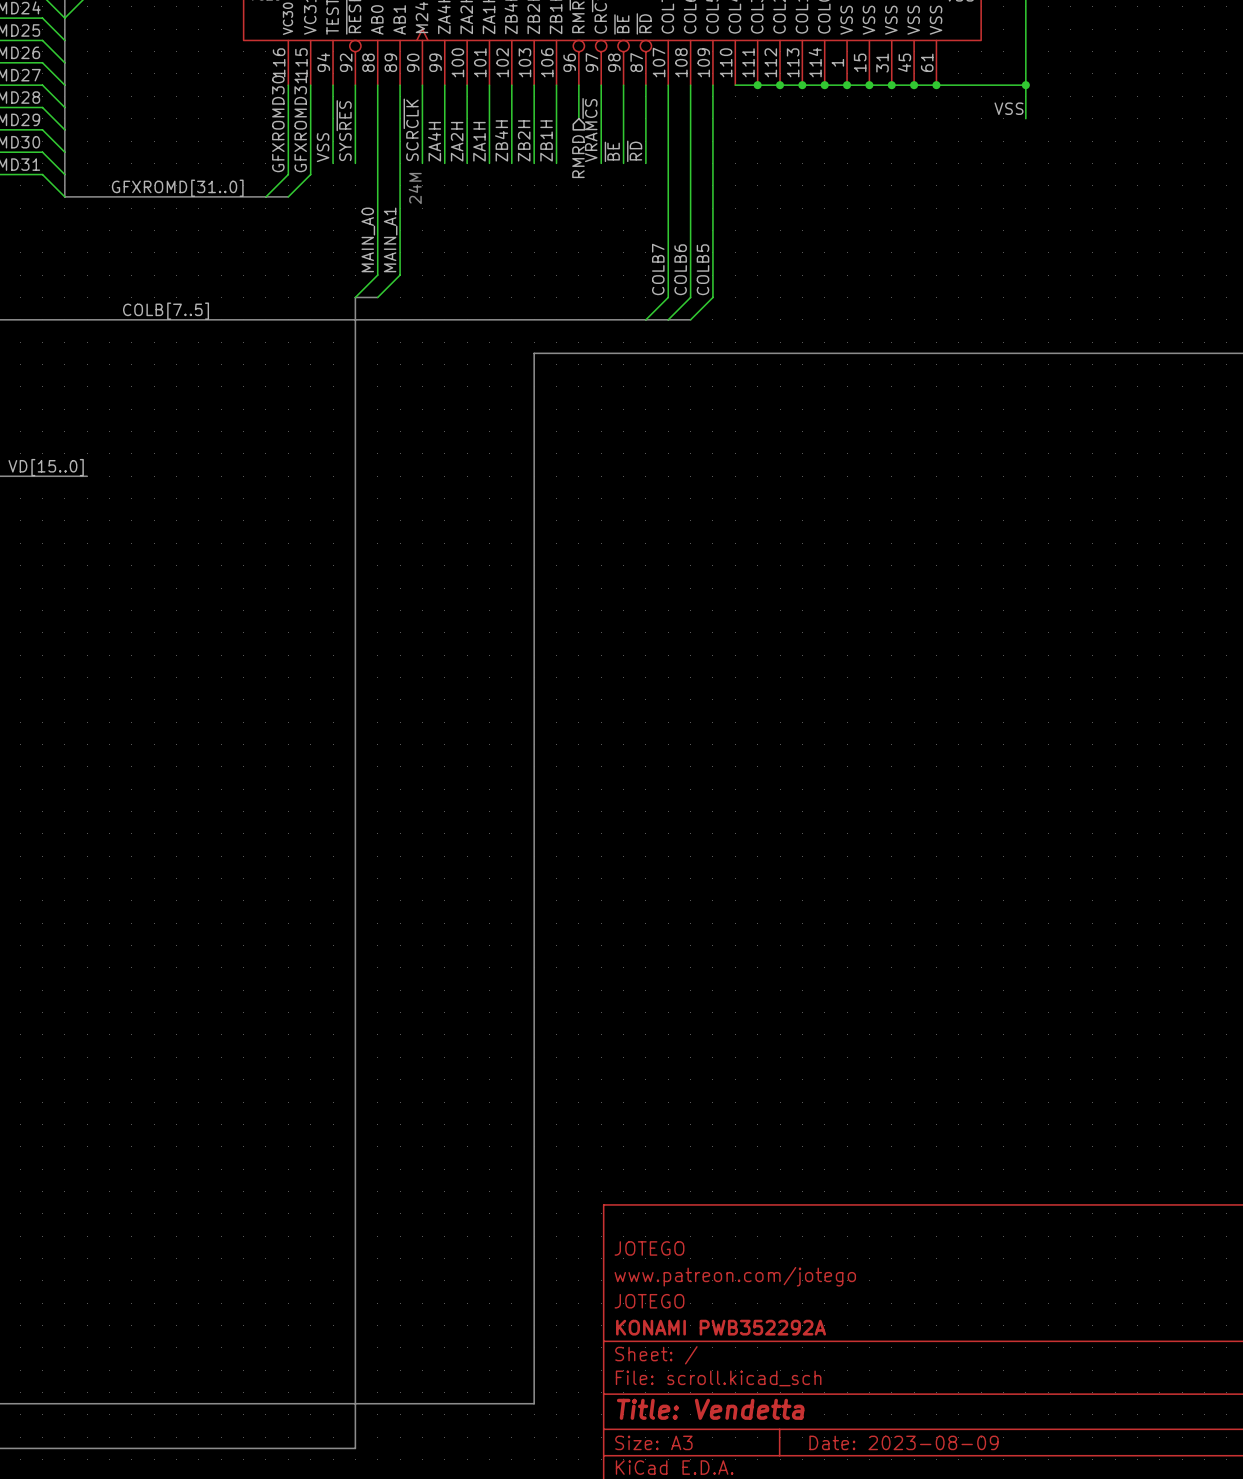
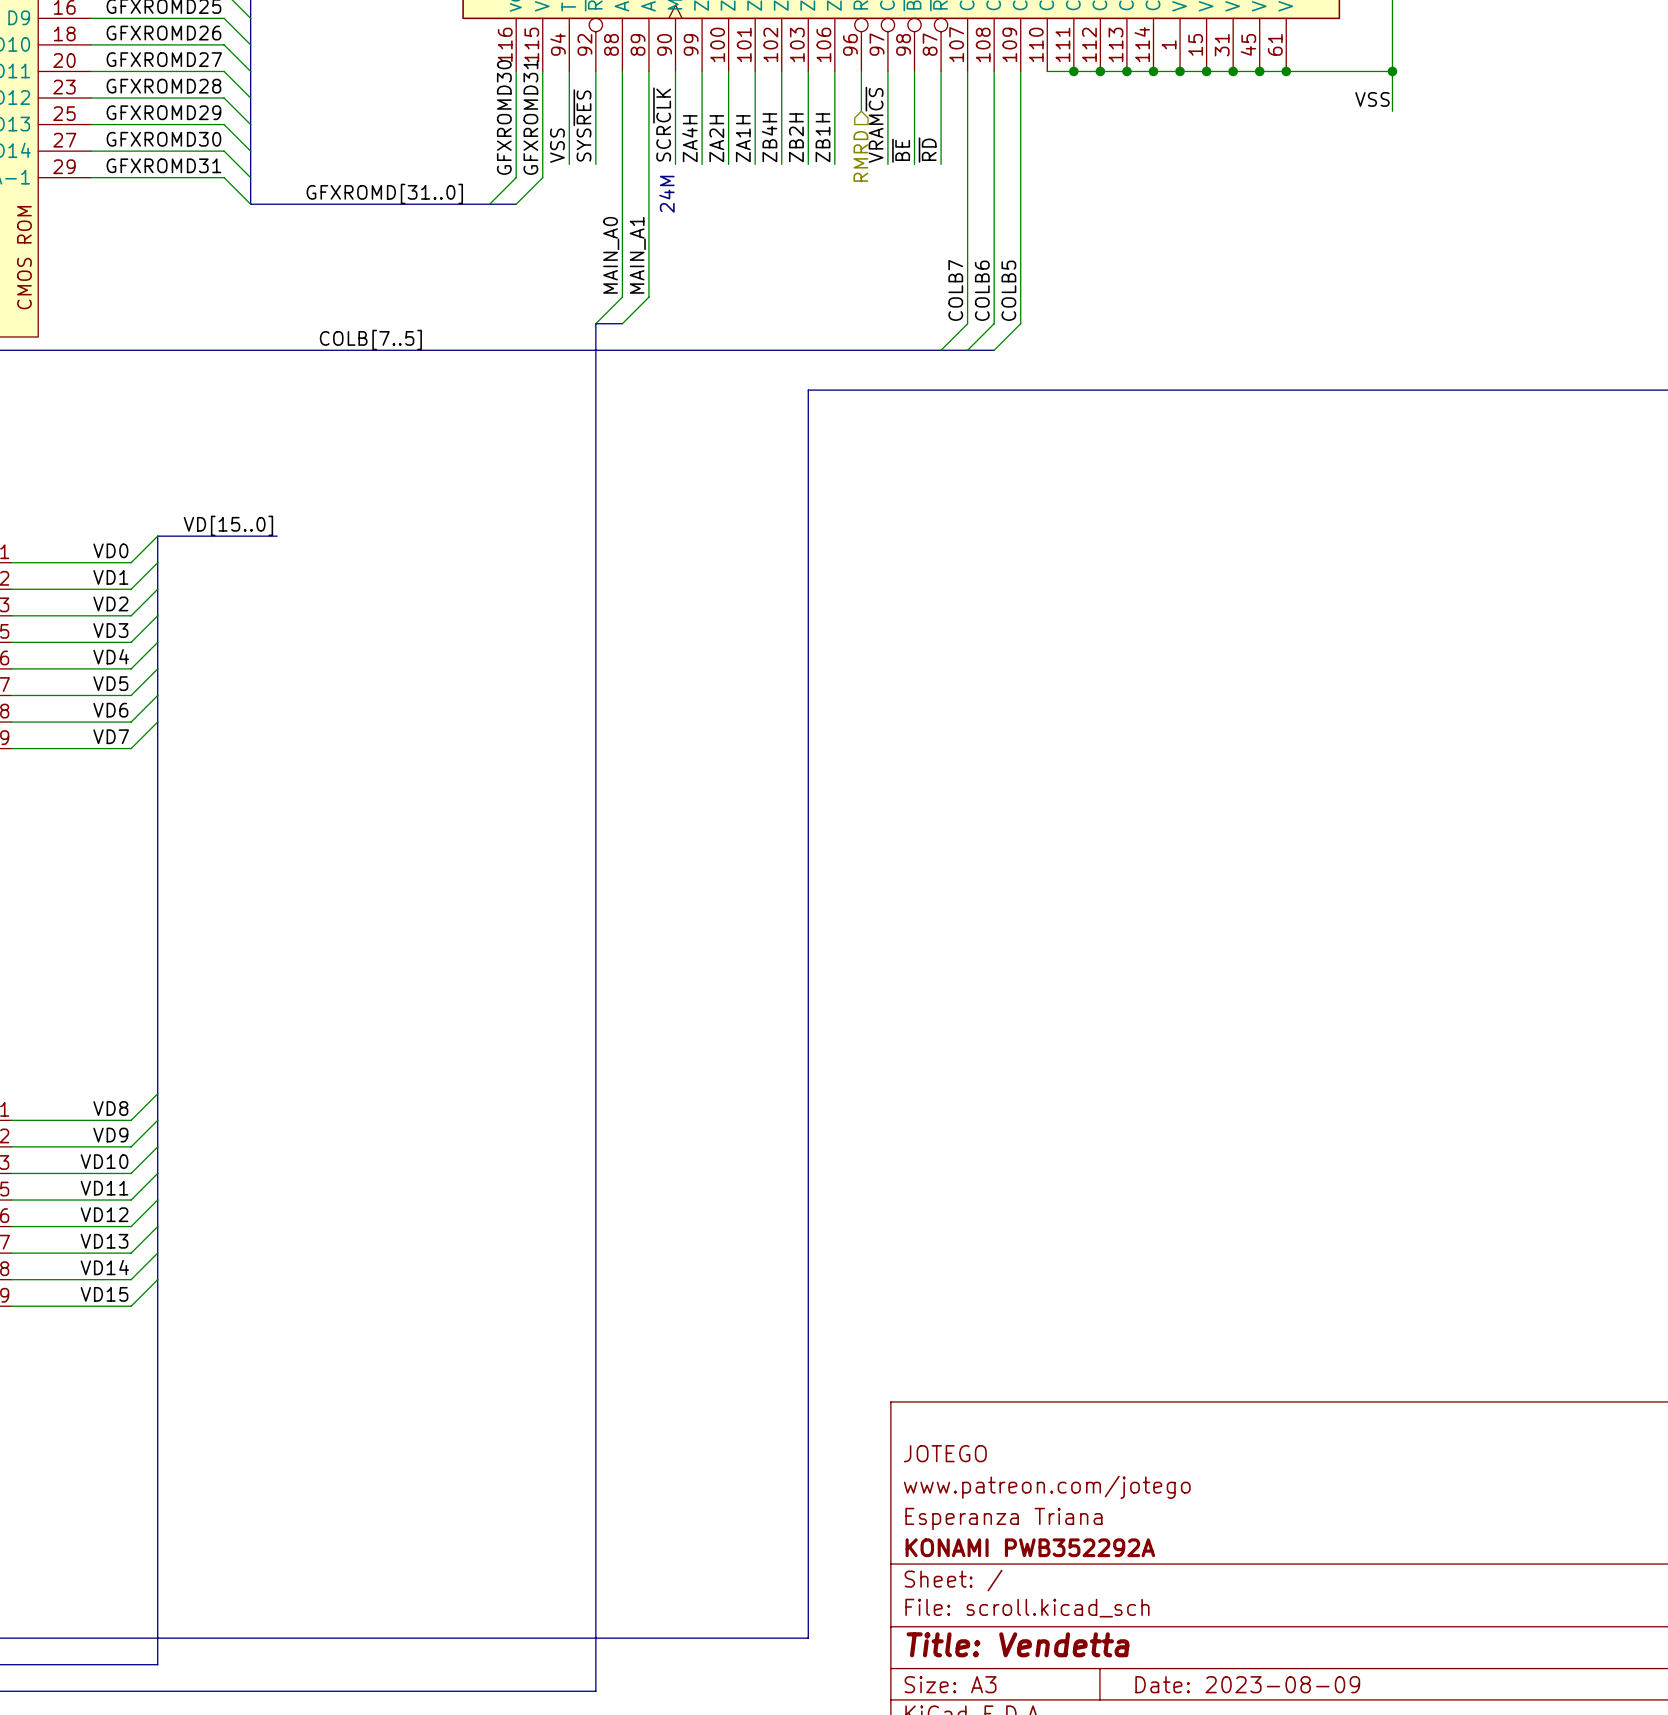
title block: JOTEGO (649, 1301) -> Esperanza Triana (1003, 1519)

